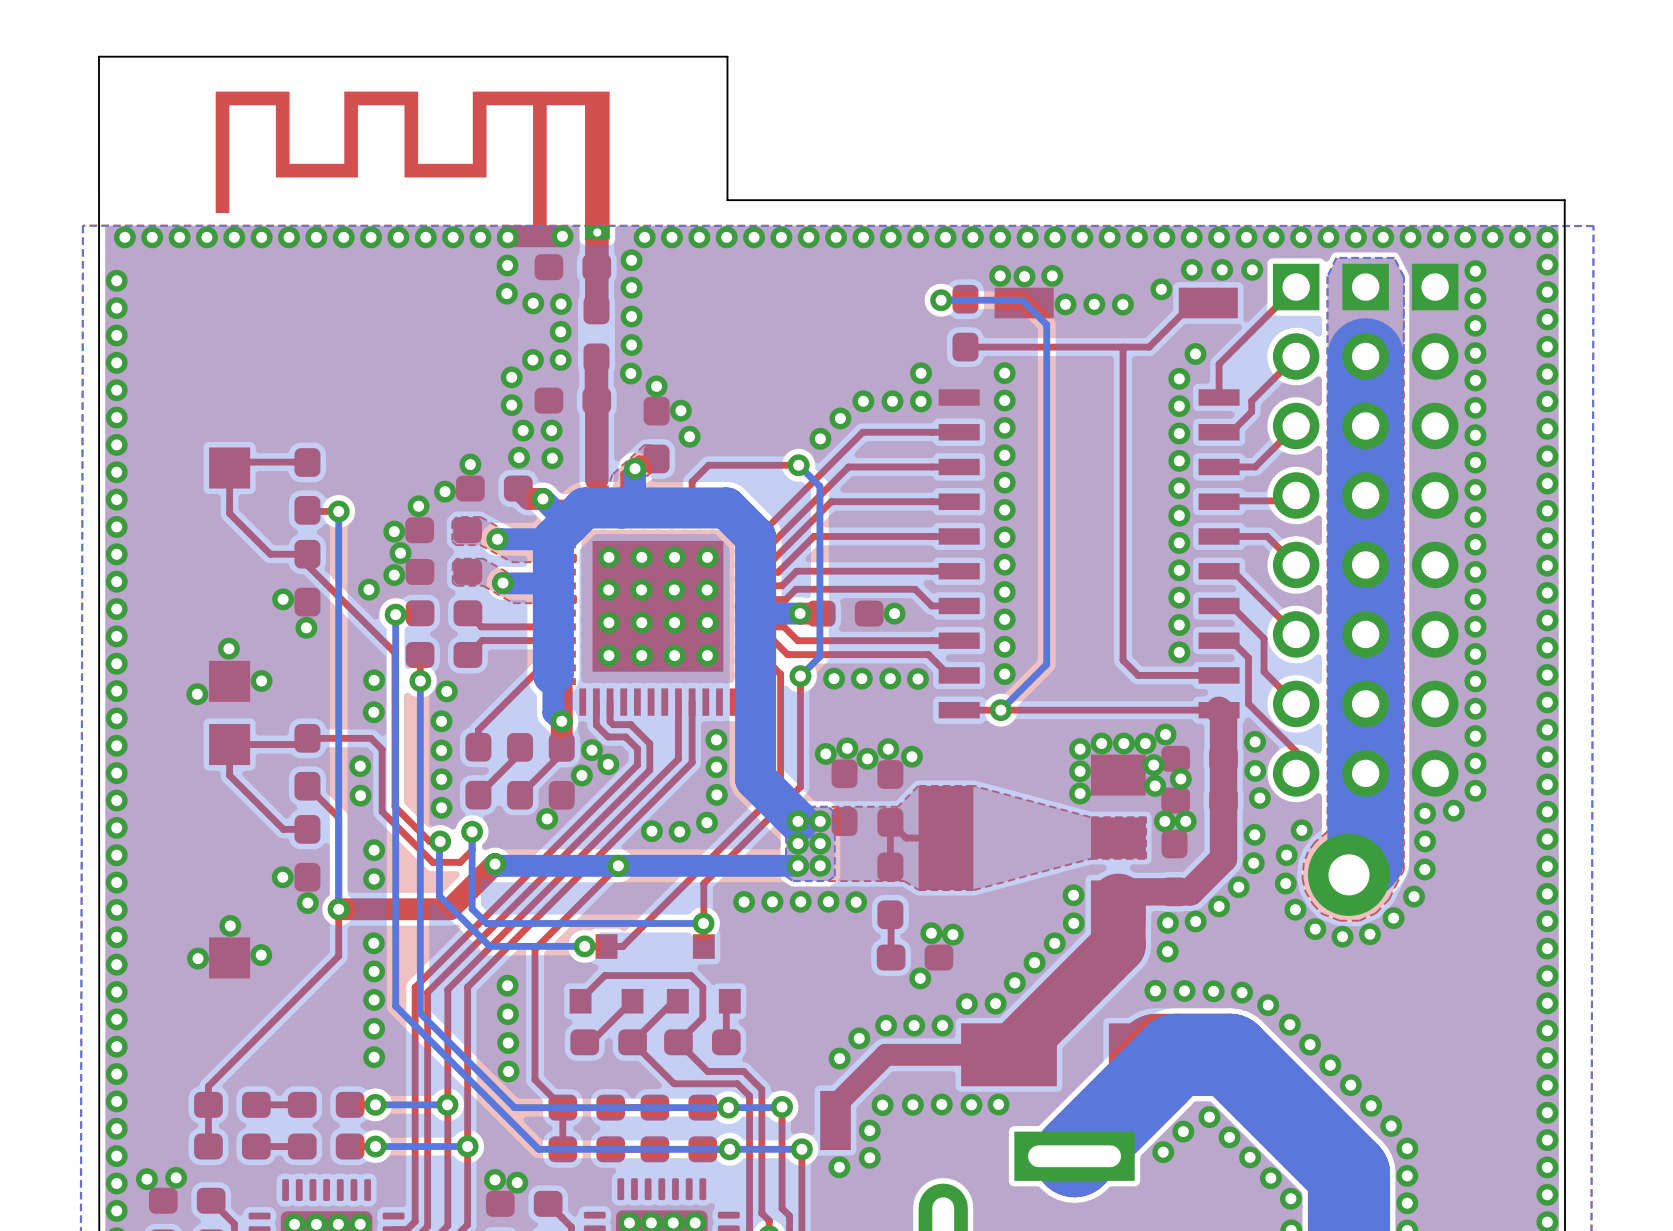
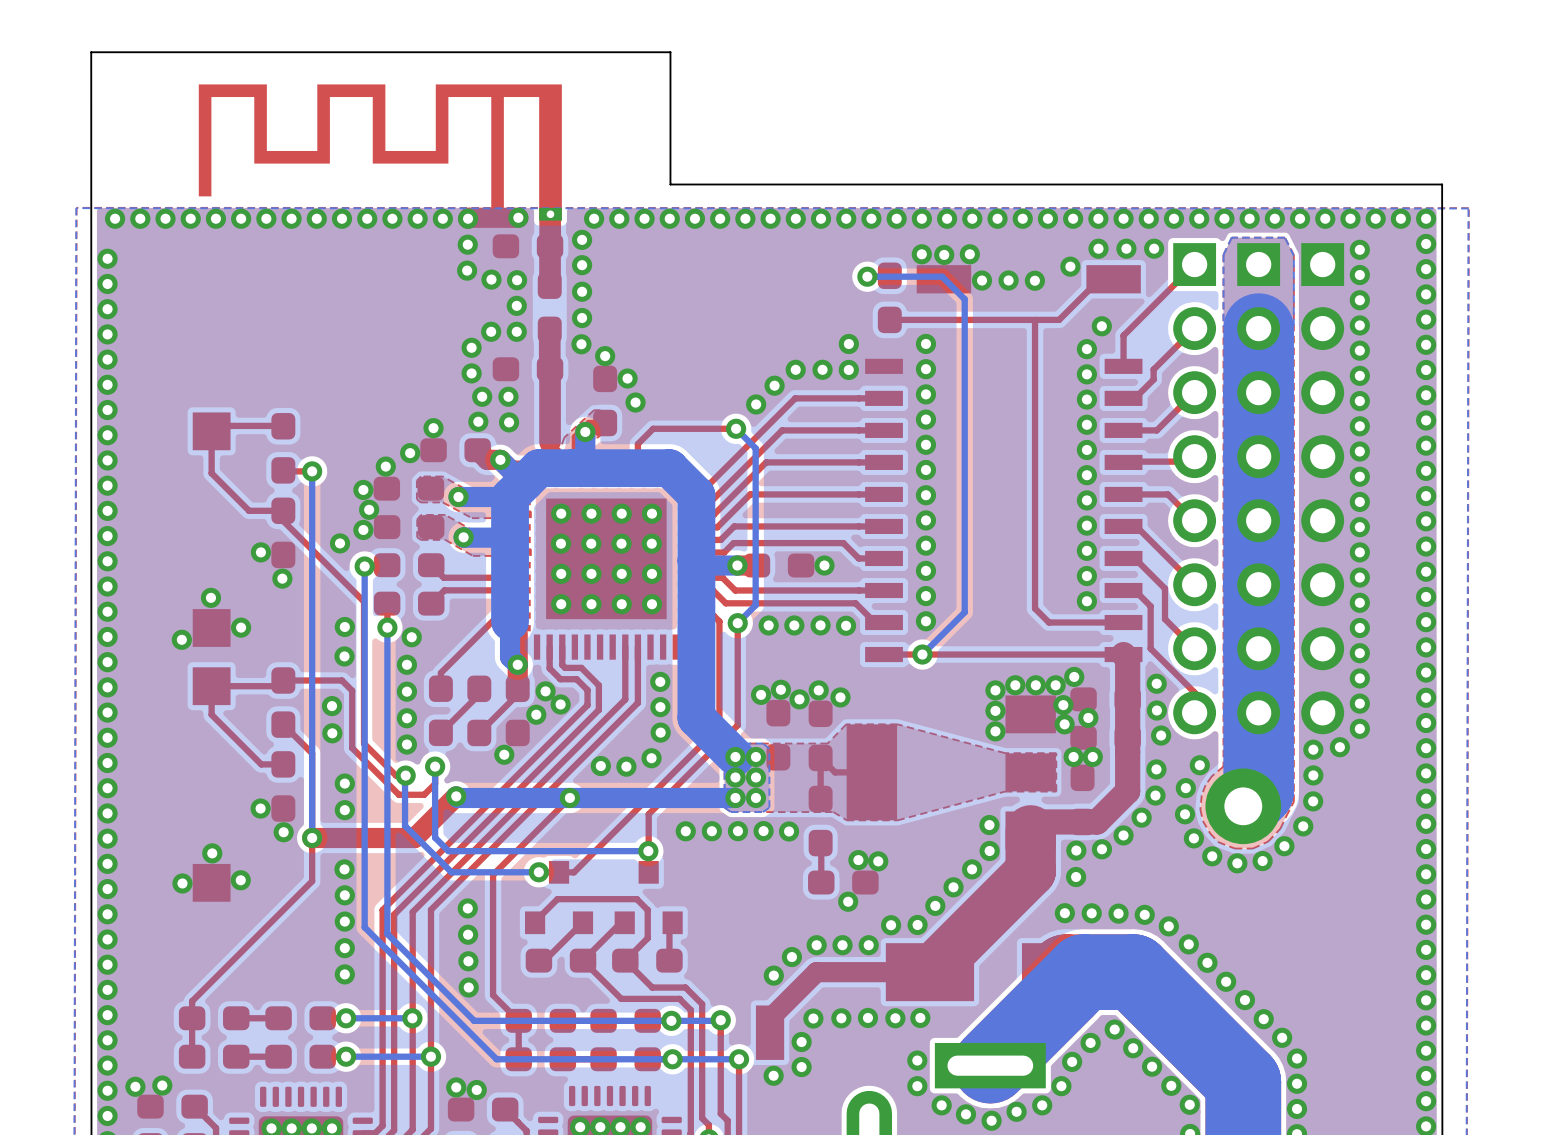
via: none -> (917, 1060)
via: none -> (917, 1086)
via: none -> (1061, 1086)
via: none -> (941, 1105)
via: none -> (1042, 1105)
via: none -> (1016, 1111)
via: none -> (966, 1114)
via: none -> (991, 1120)

